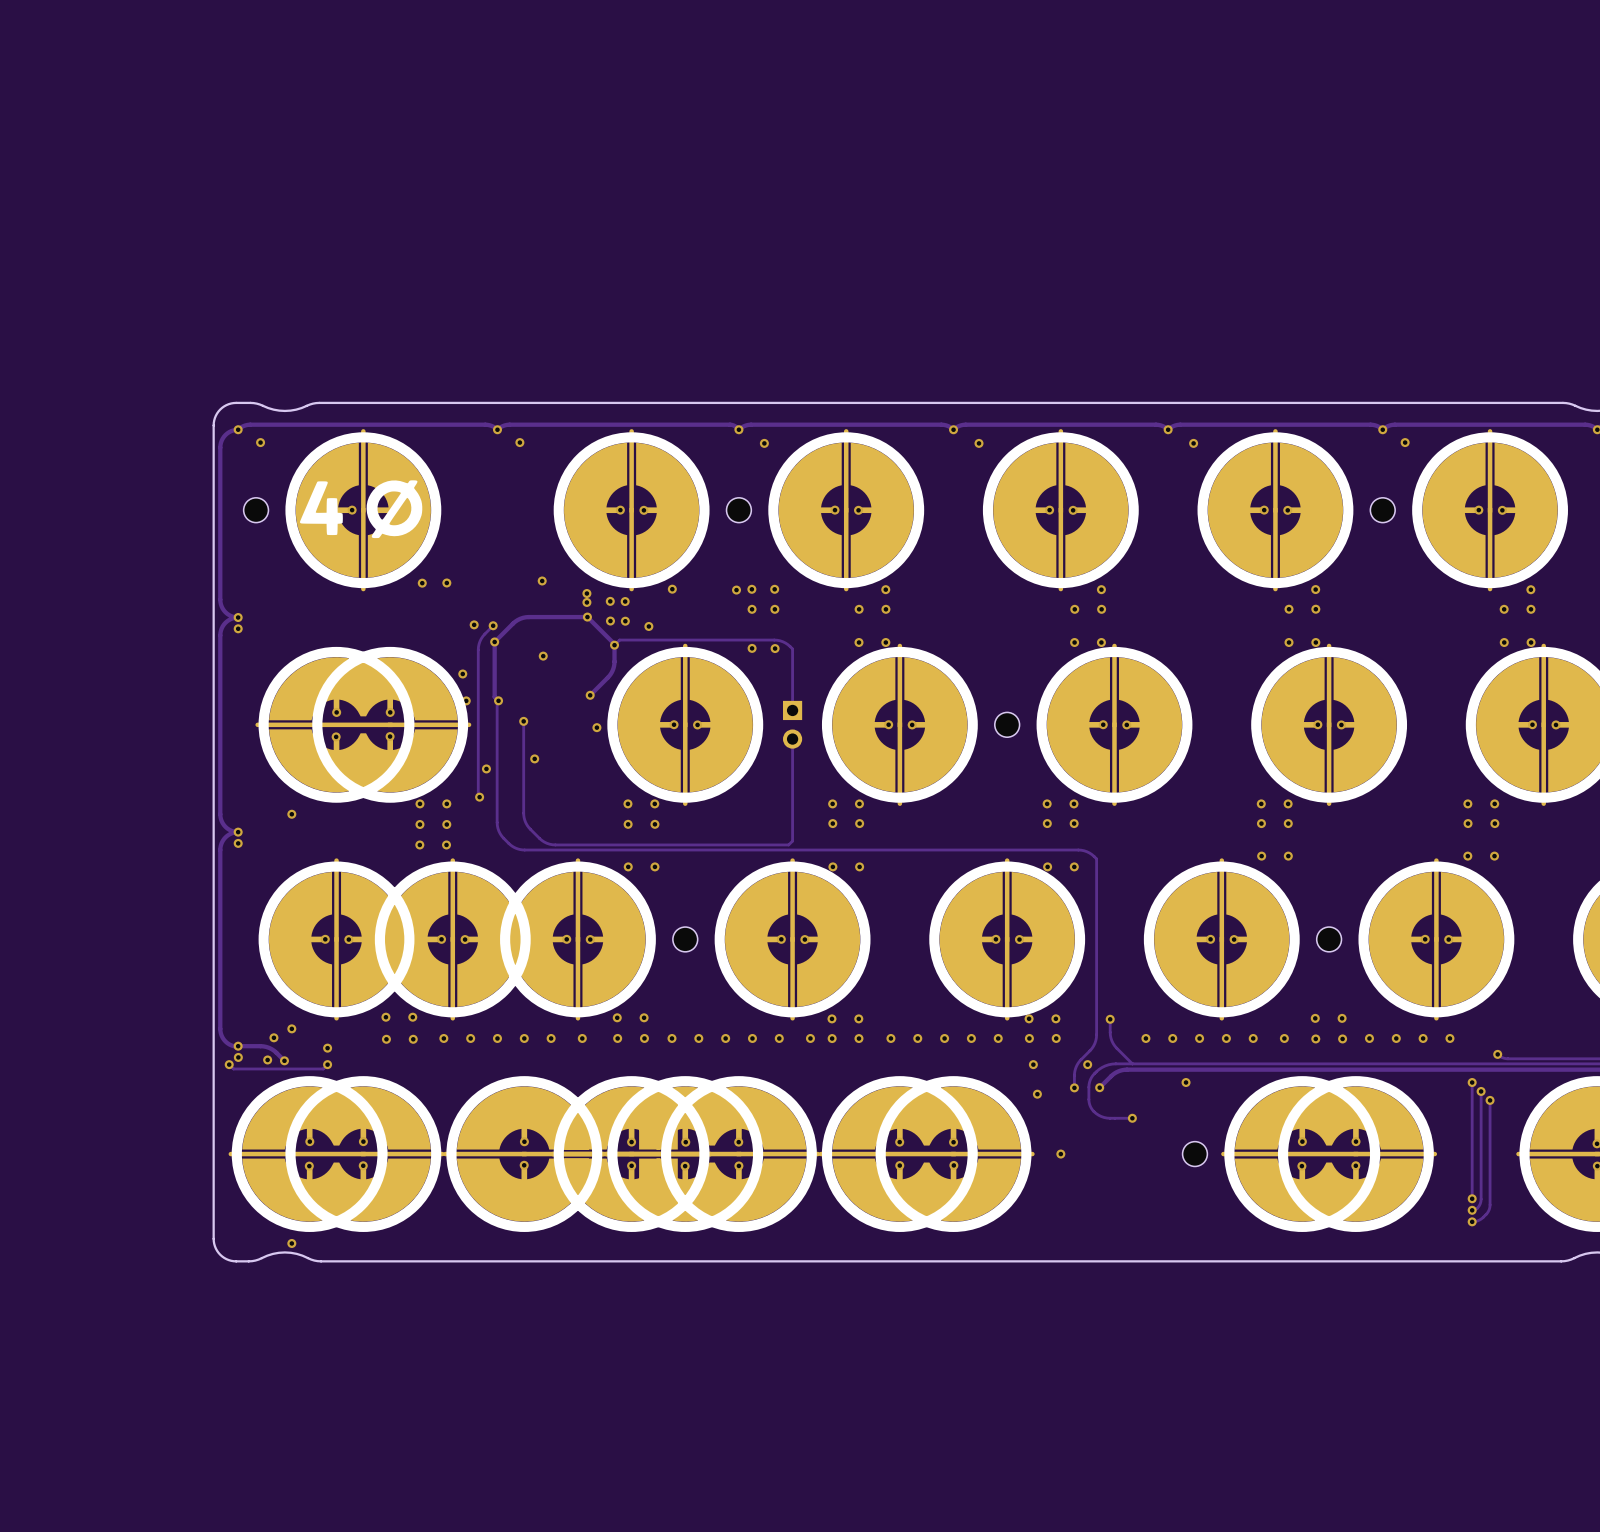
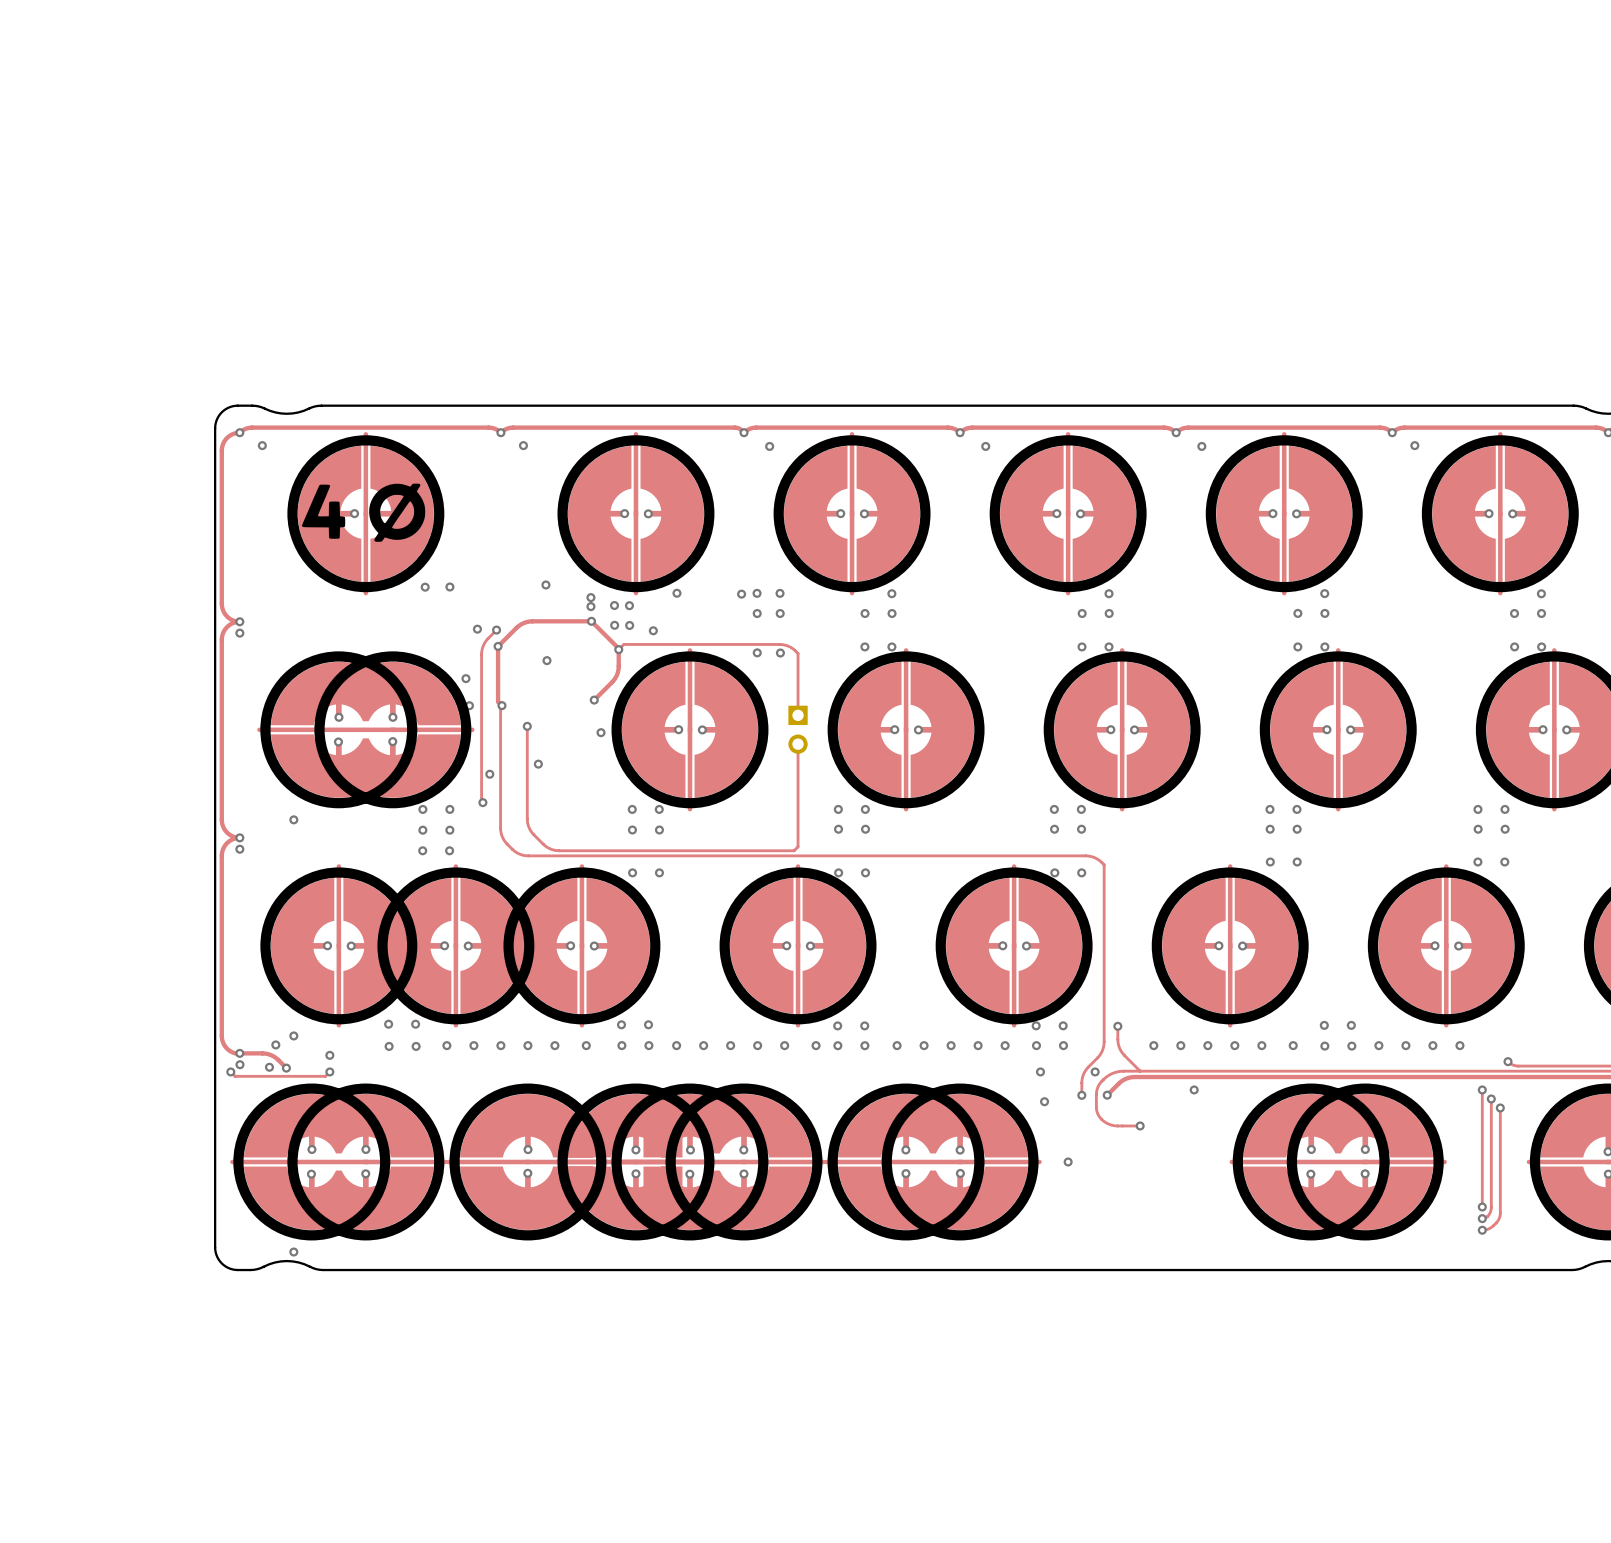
part: (256, 510) -> none
part: (738, 510) -> none
part: (1382, 510) -> none
part: (1007, 724) -> none
part: (685, 939) -> none
part: (1329, 939) -> none
part: (1194, 1154) -> none

